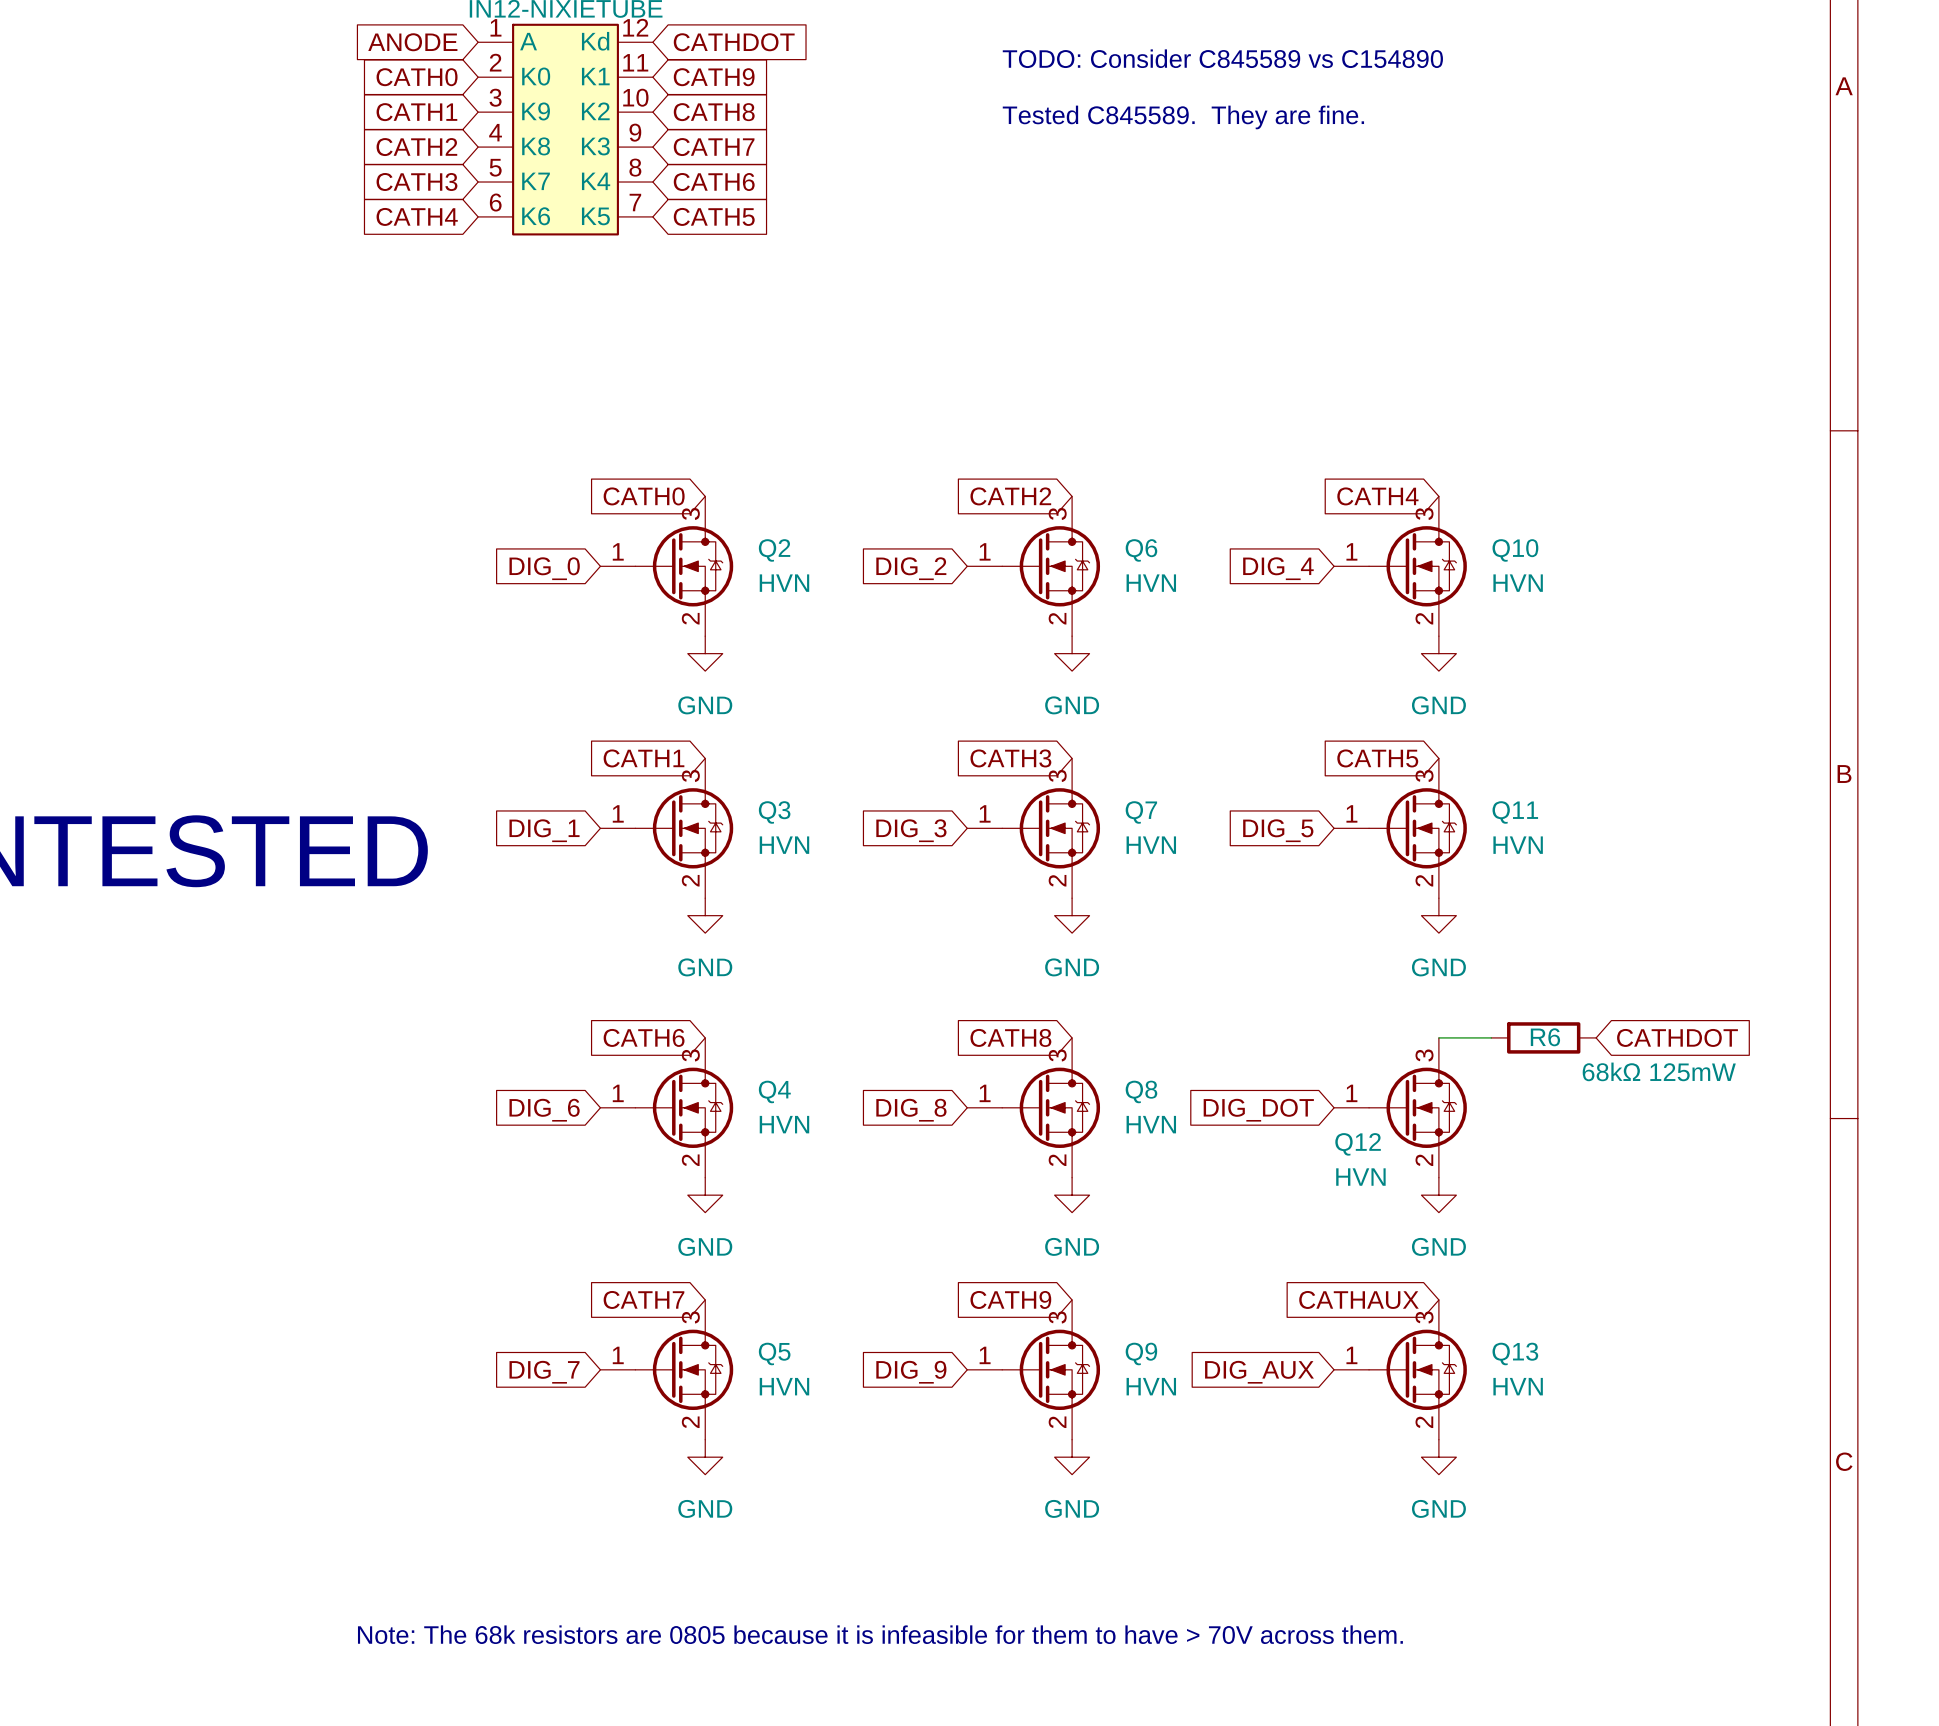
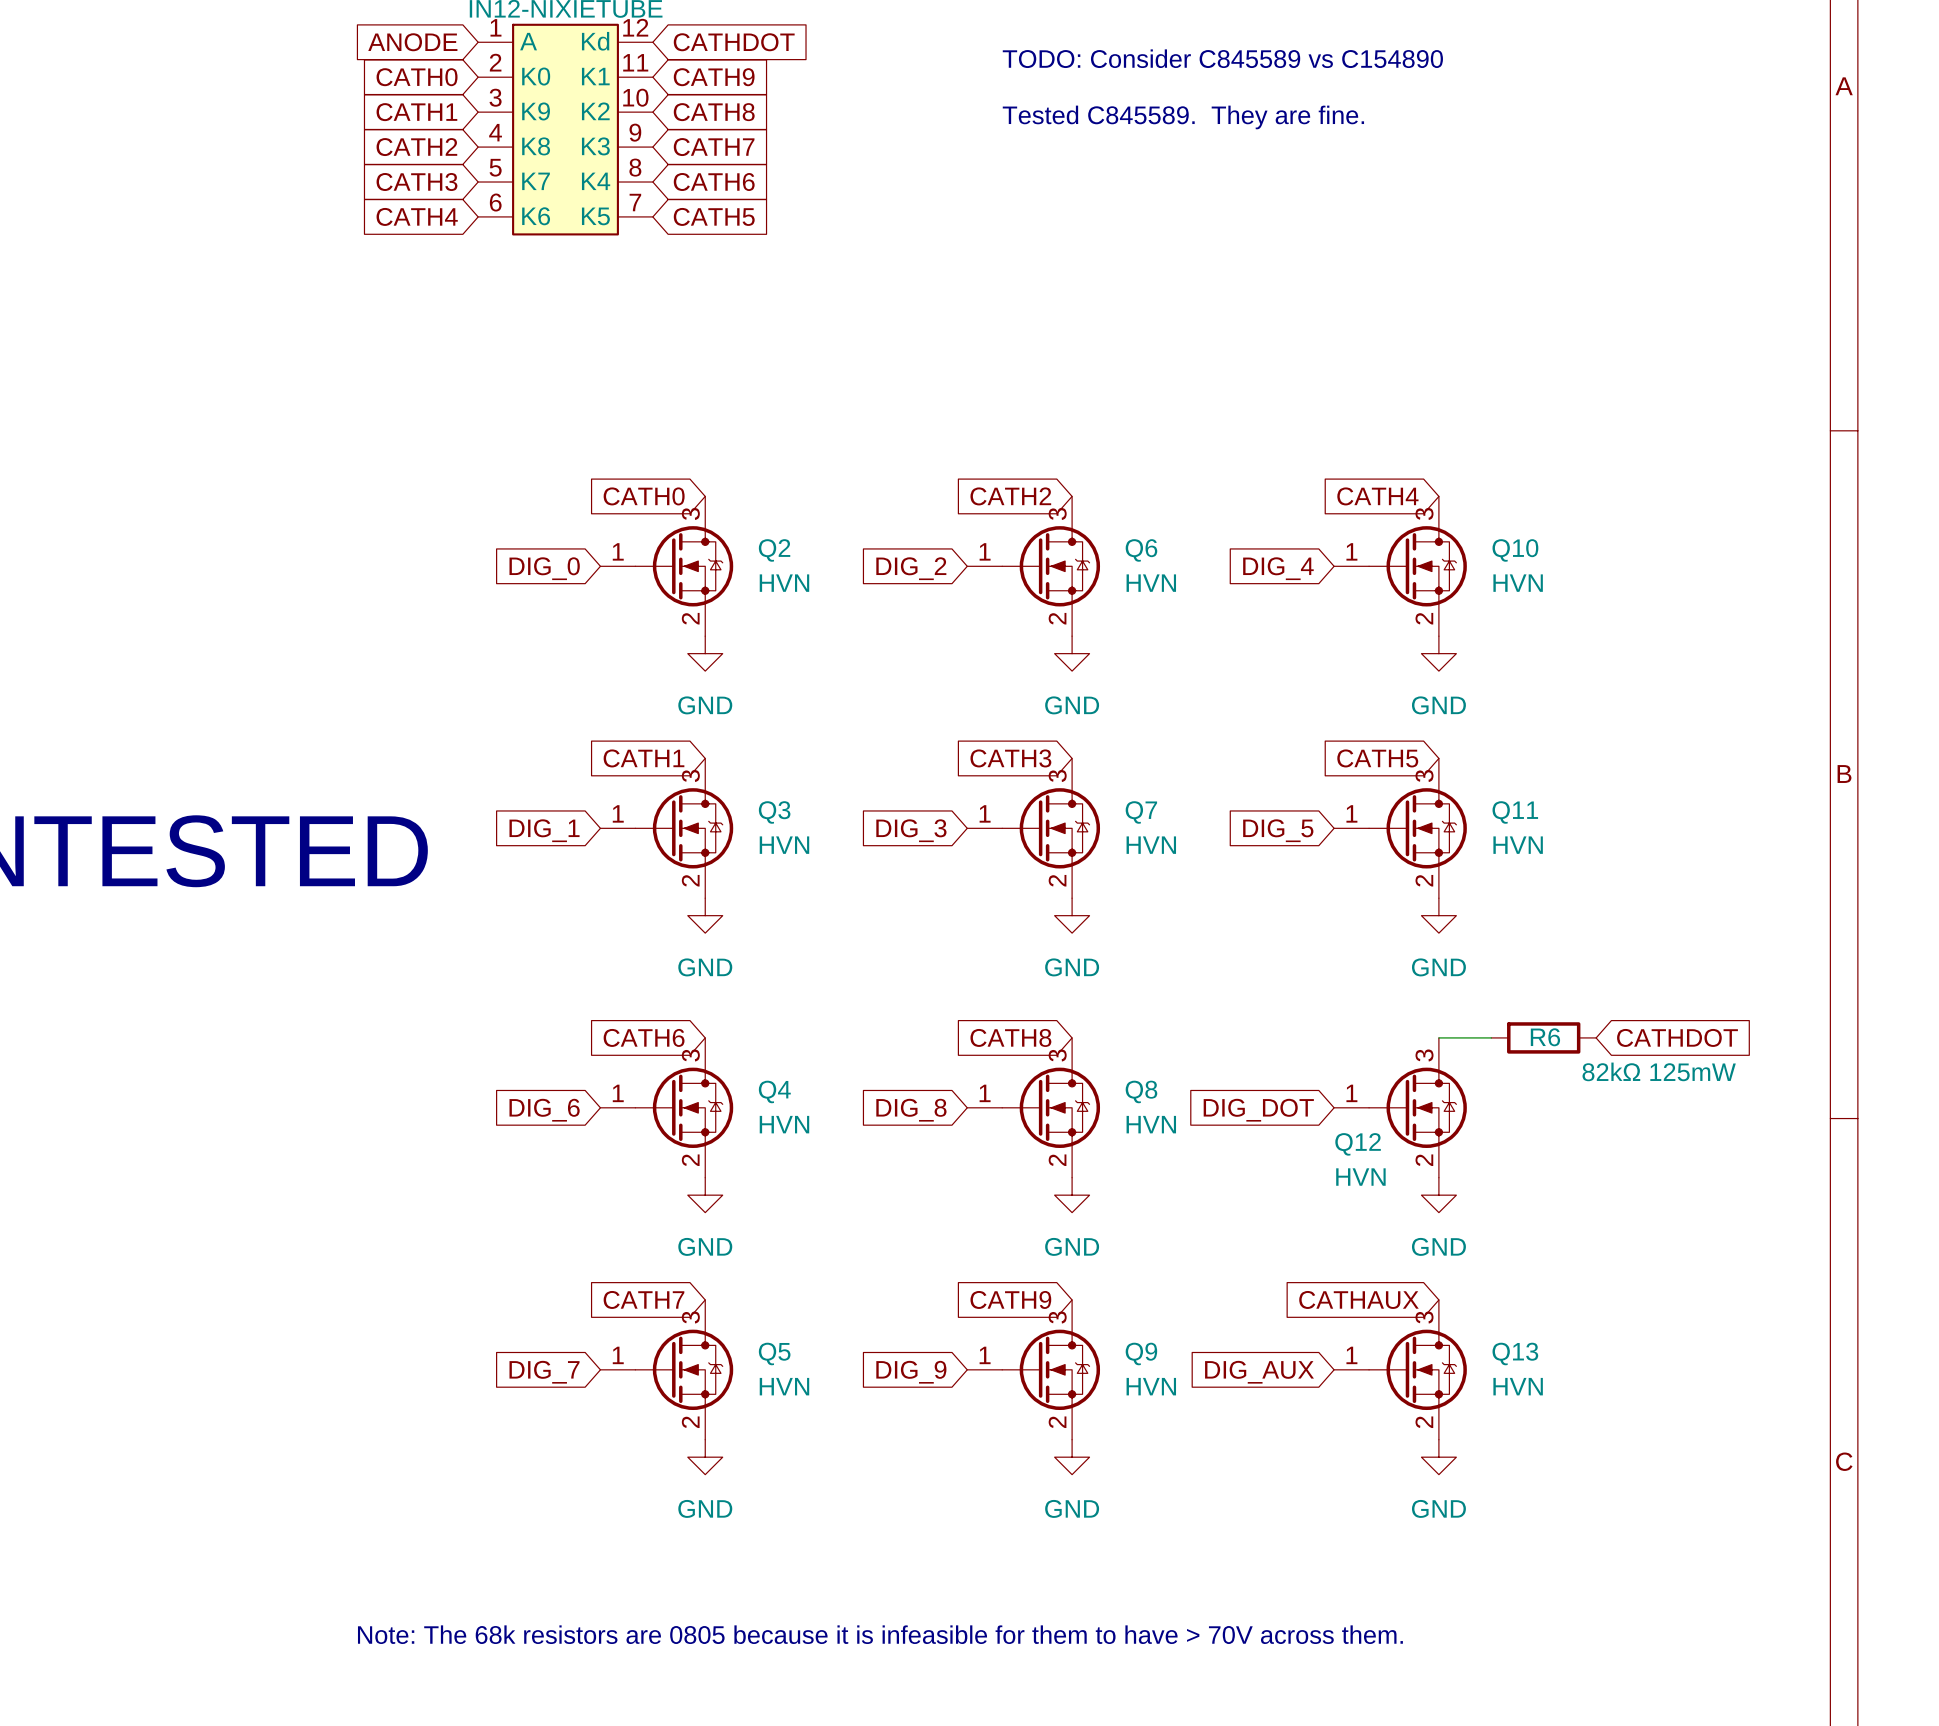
R6 value: 68kΩ 125mW (1659, 1071) -> 82kΩ 125mW (1659, 1071)

